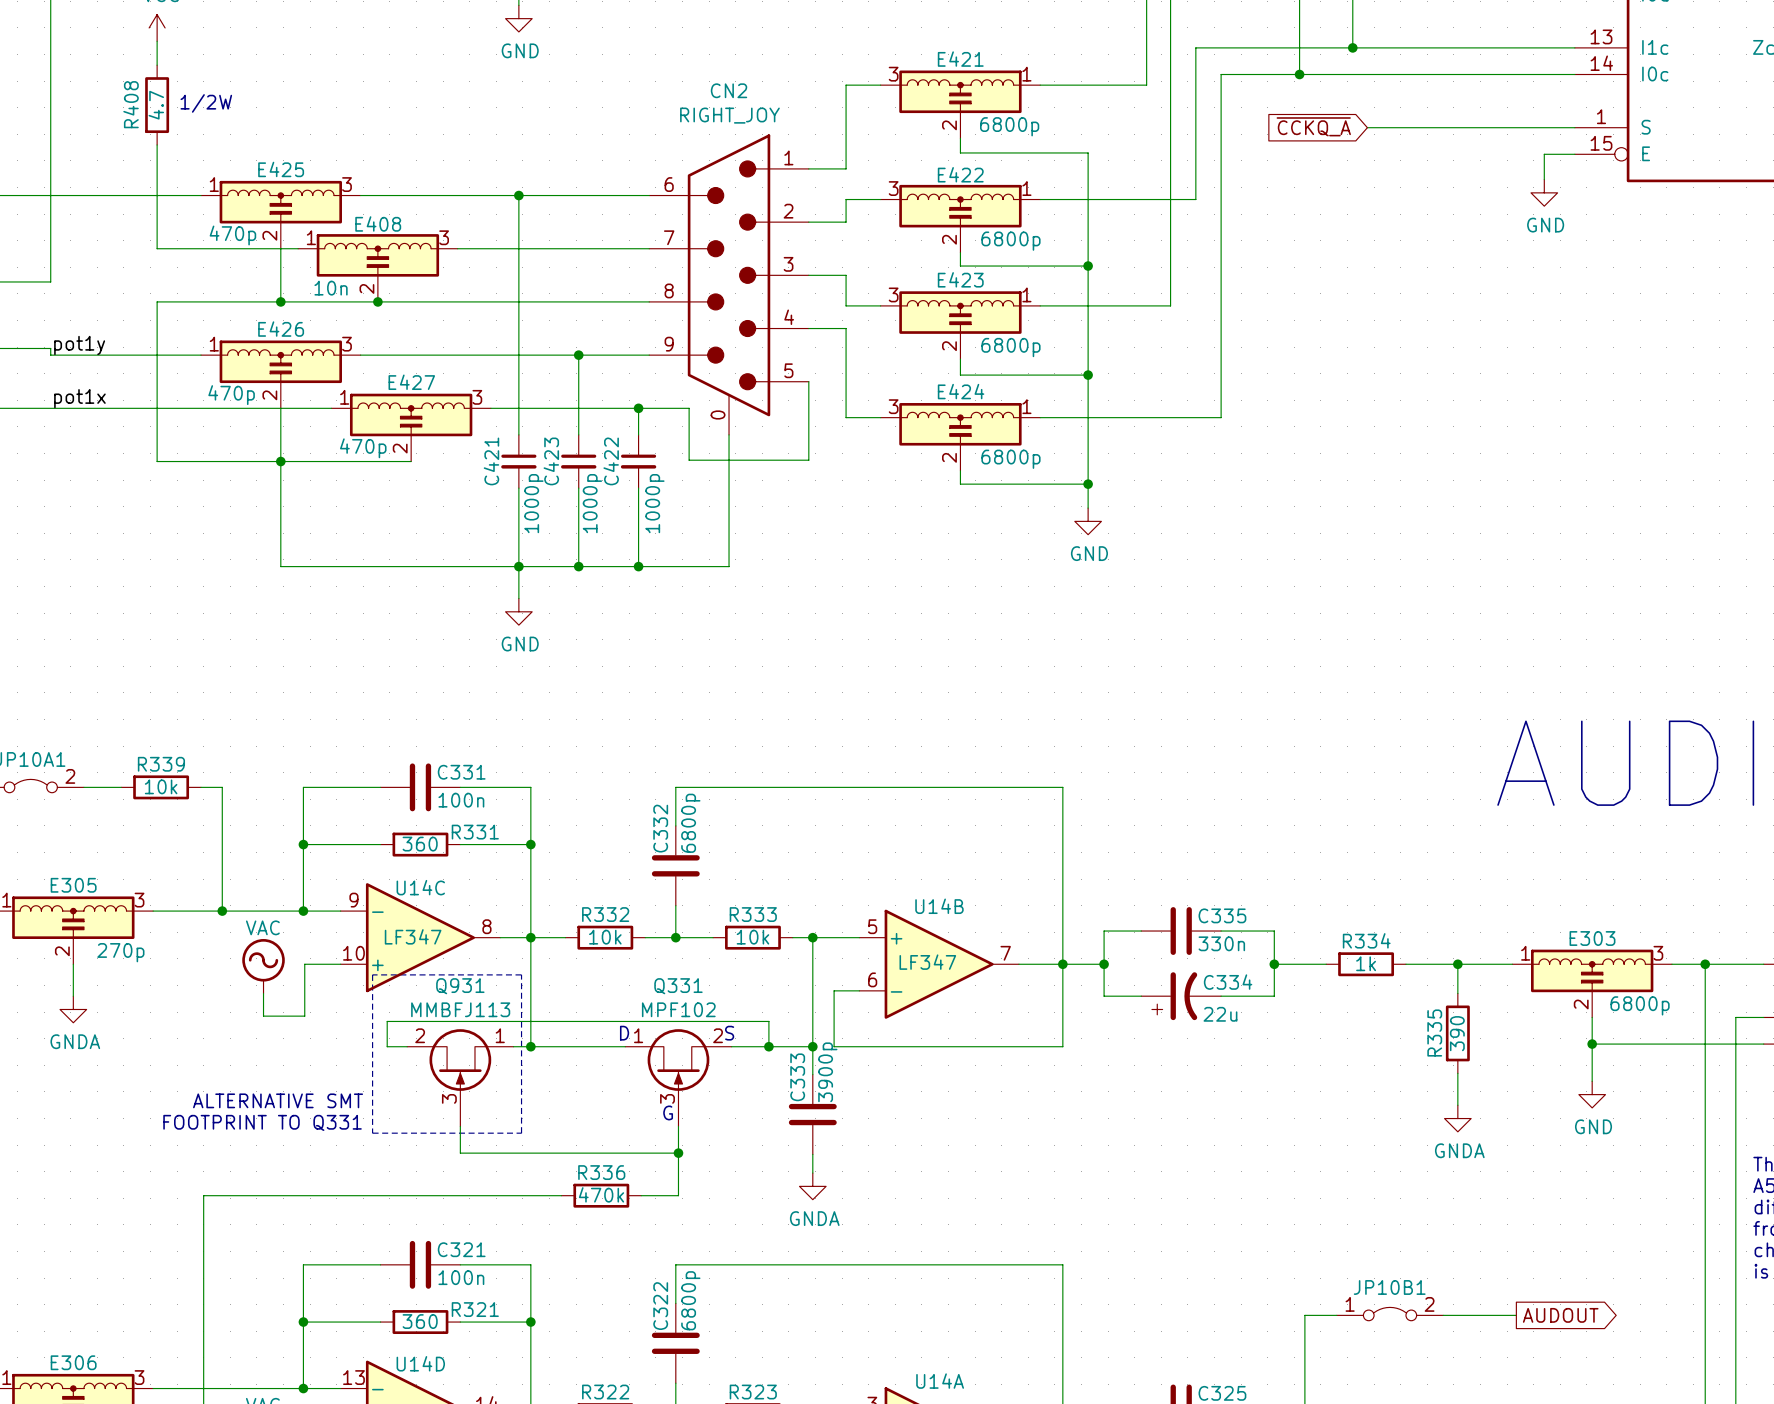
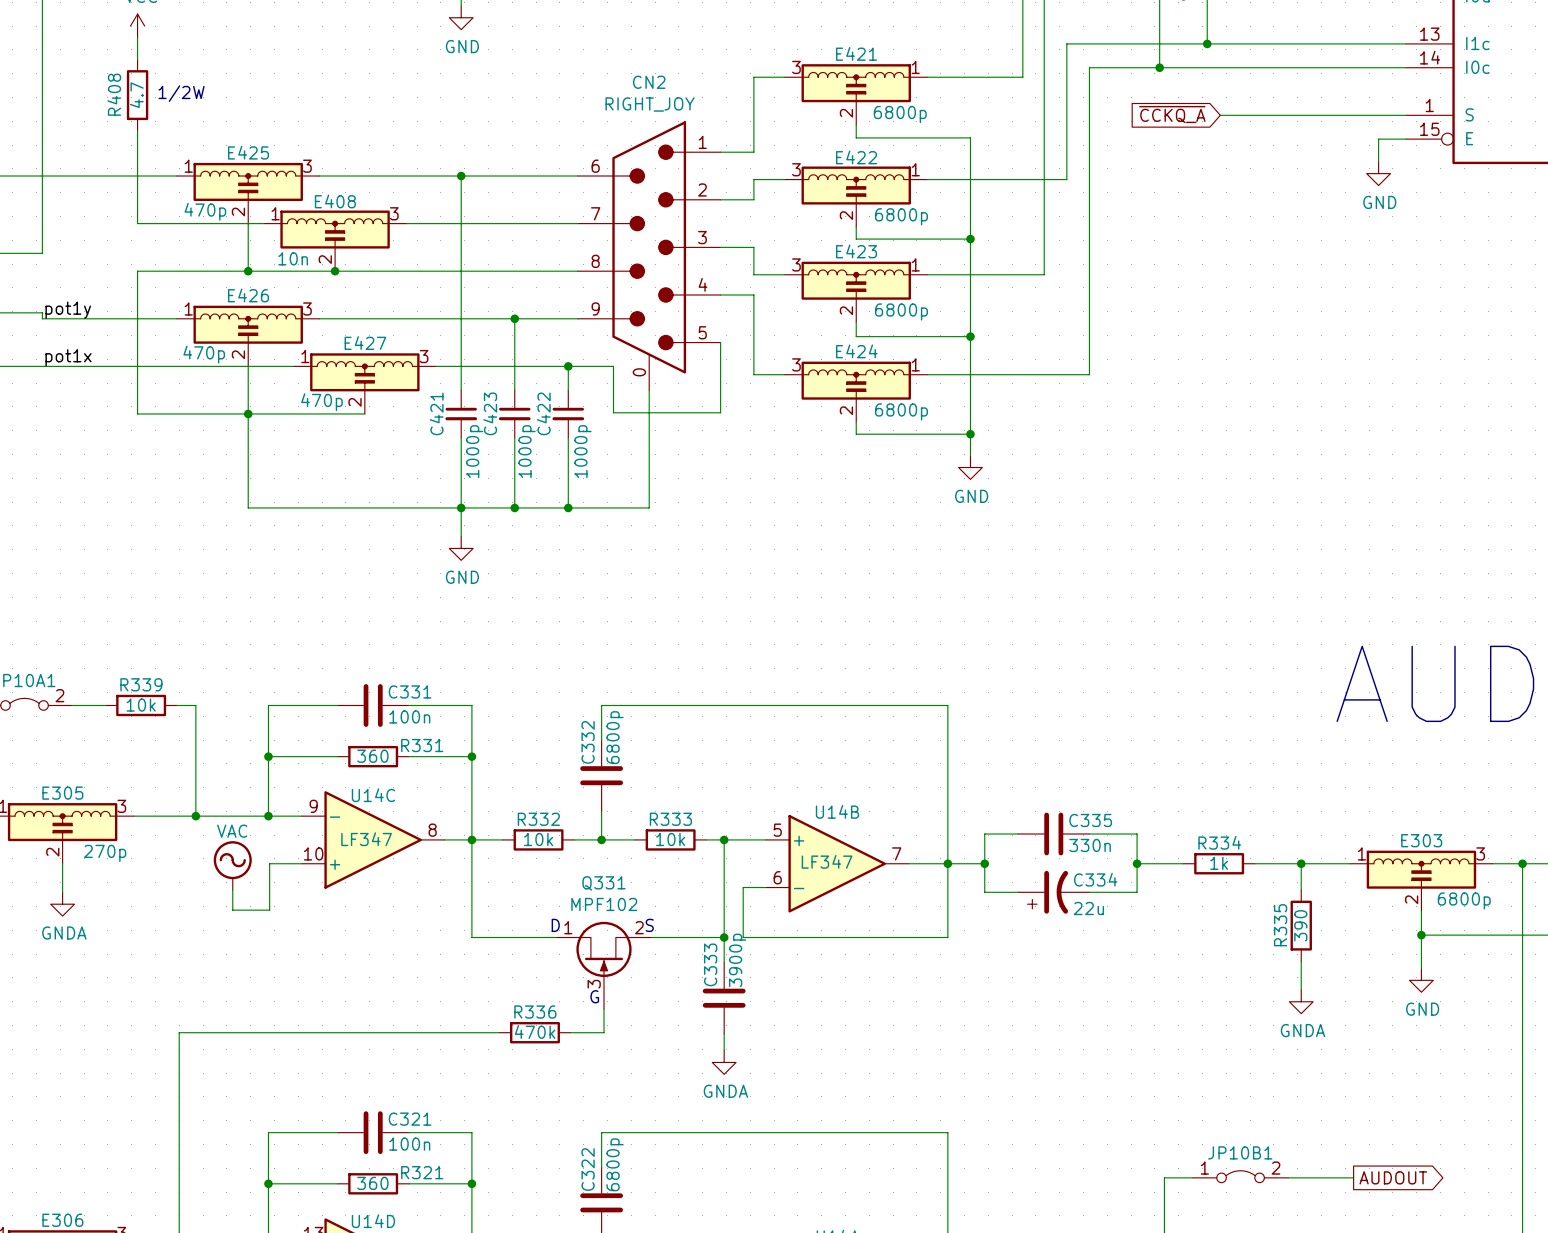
line: (372, 974) (521, 974) (521, 1133) (372, 1133) (372, 974) -> none
wire: (407, 1046) (387, 1046) (387, 1021) (768, 1021) (768, 1046) -> none
wire: (513, 1046) (530, 1046) -> none
junction: (530, 1046) -> none
junction: (768, 1046) -> none
Q931: MMBFJ113 (460, 1077) -> none
text: ALTERNATIVE SMT (278, 1100) -> none
text: FOOTPRINT TO Q331 (262, 1122) -> none
wire: (460, 1126) (460, 1153) -> none
wire: (678, 1153) (678, 1195) (641, 1195) -> none
junction: (678, 1153) -> none
wire: (203, 1195) (561, 1195) -> (179, 1070) (179, 1032) (408, 1032)
R336 position: (601, 1195) -> (534, 1032)

